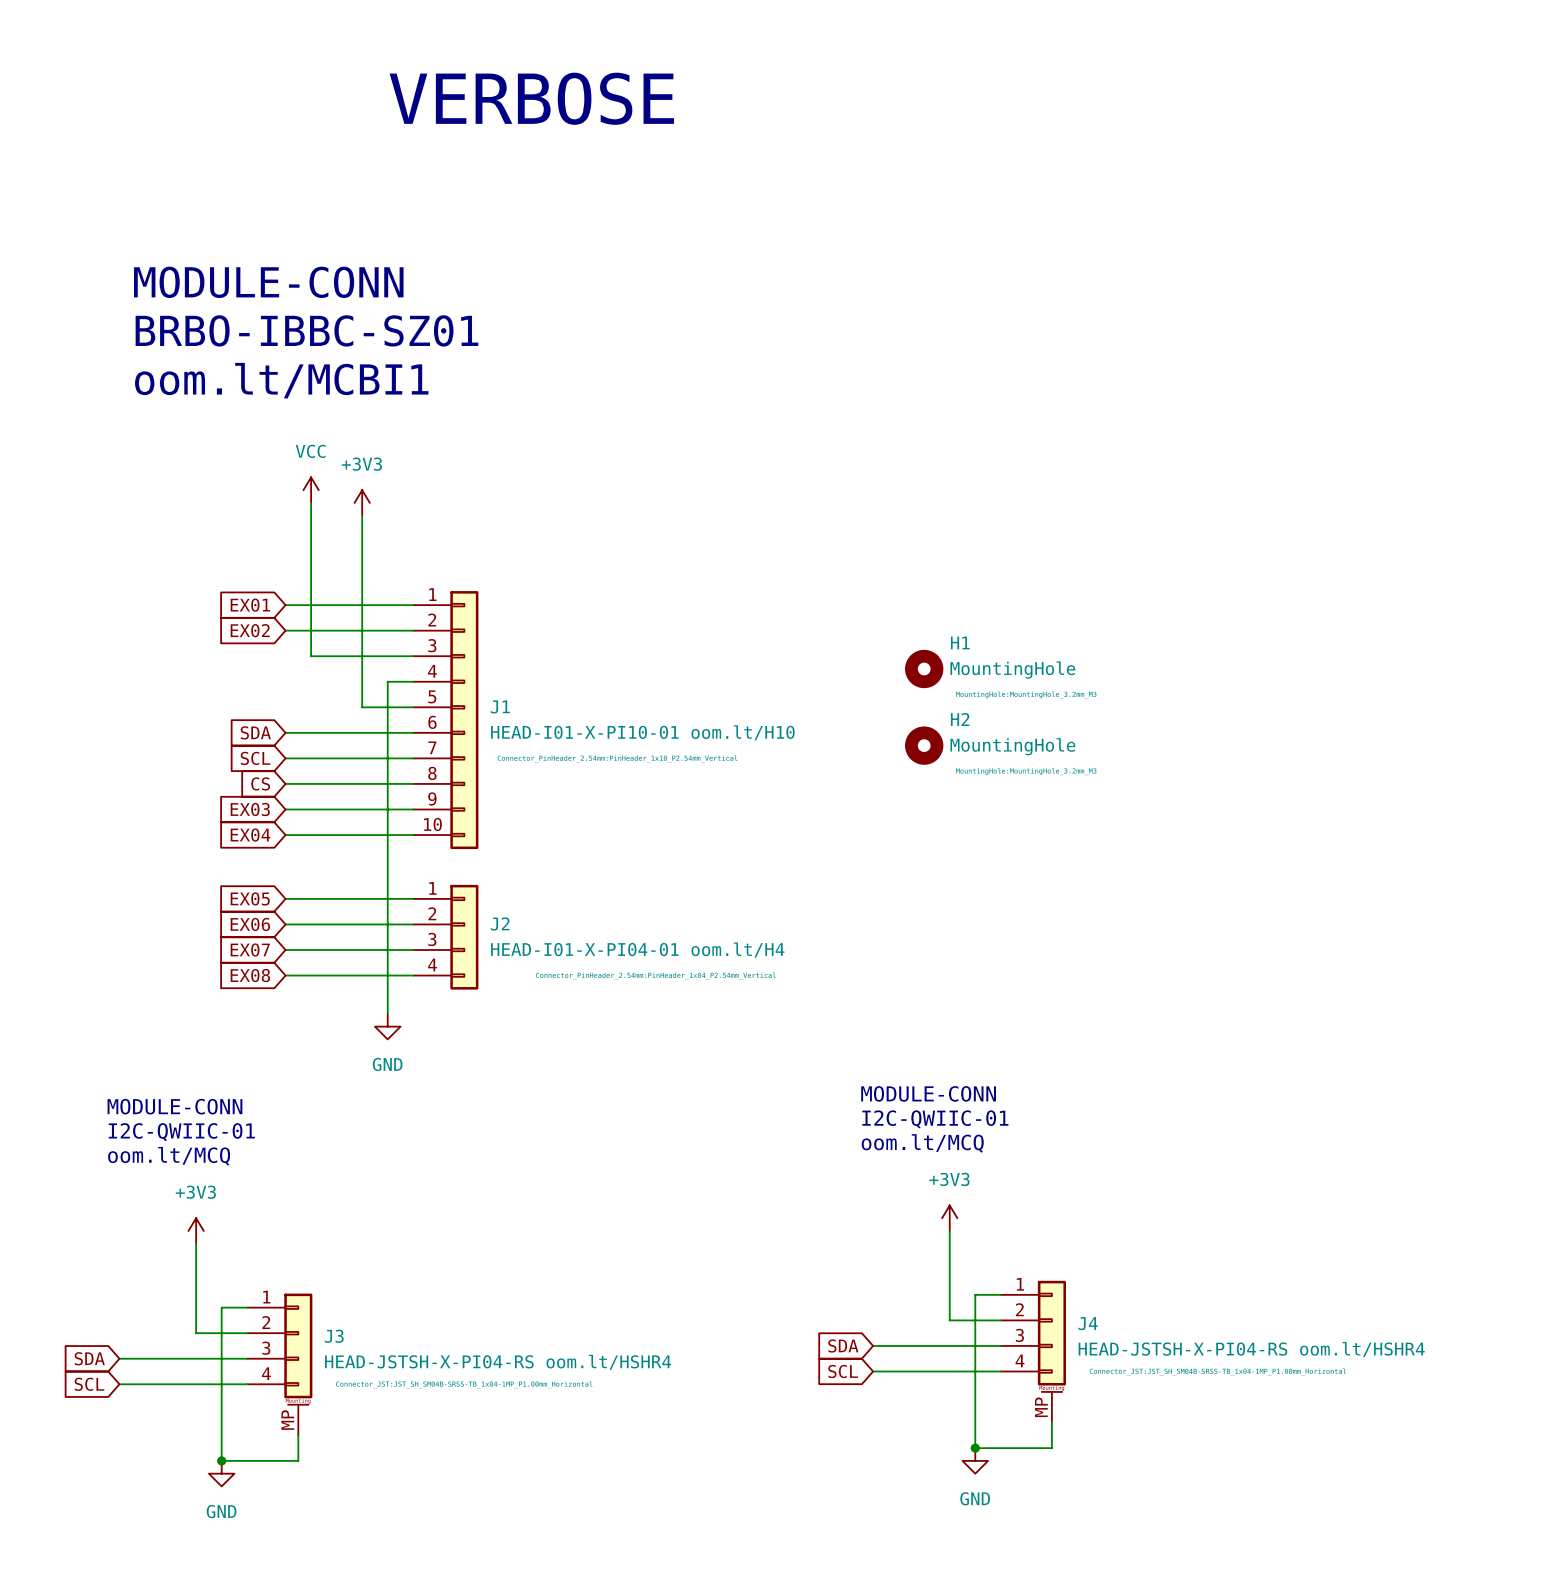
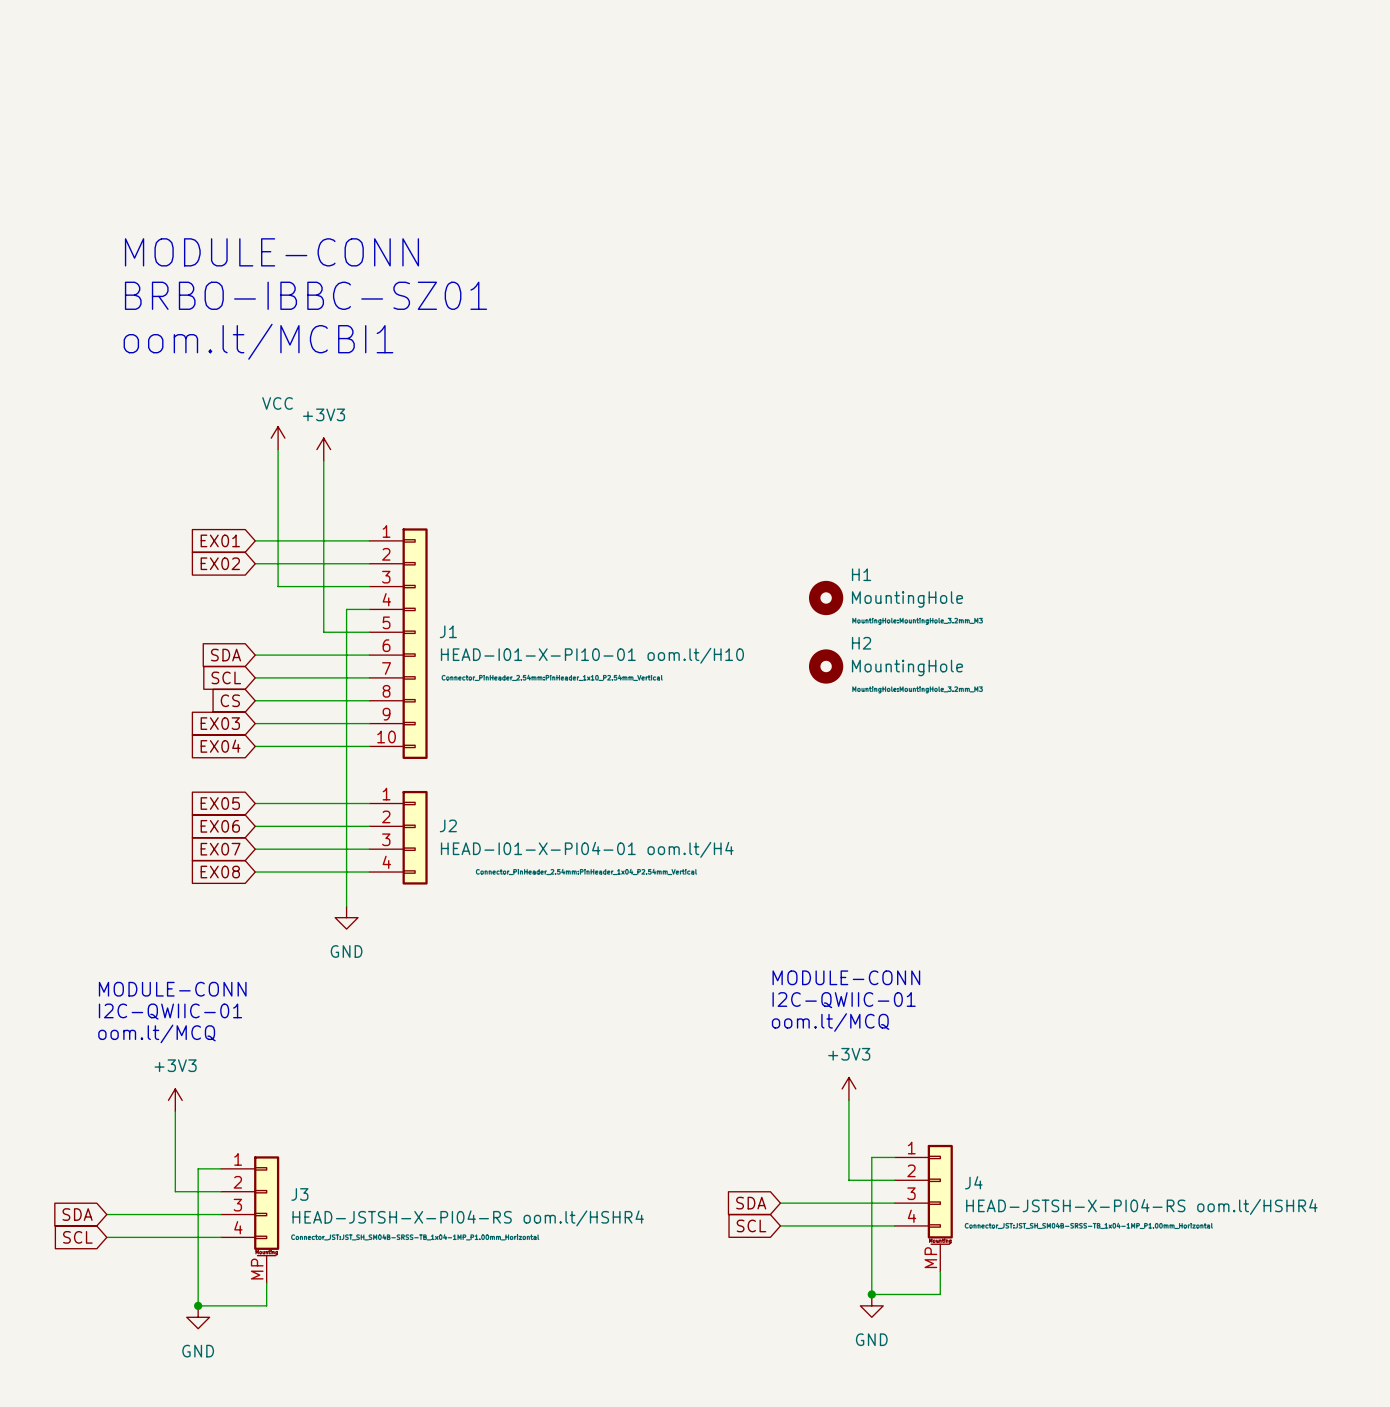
text: VERBOSE (531, 98) -> none

